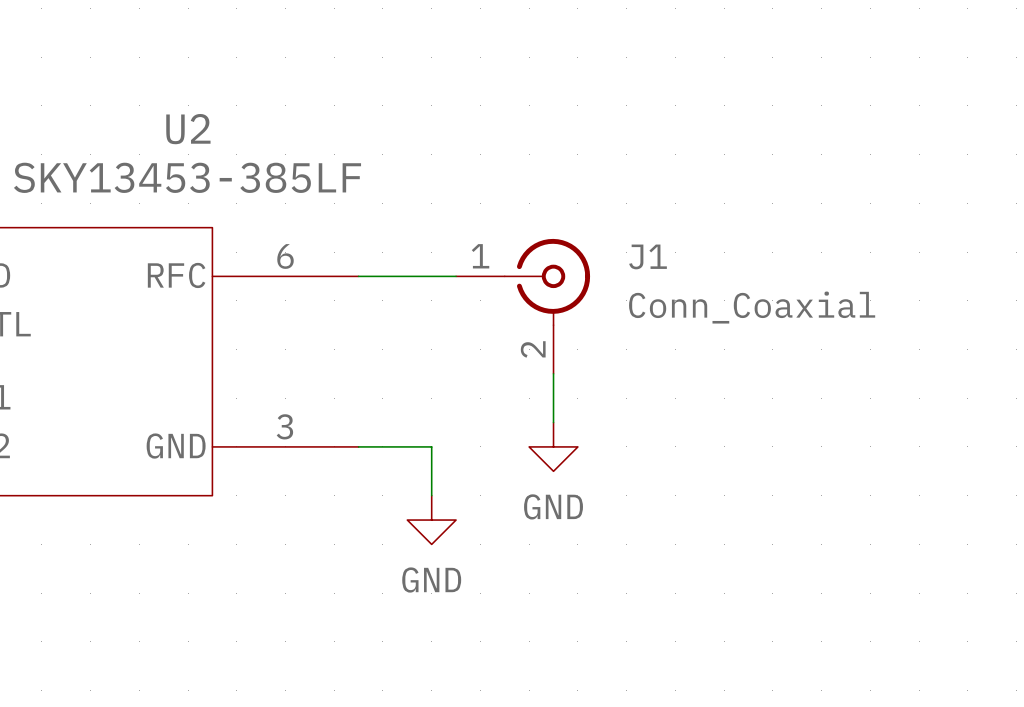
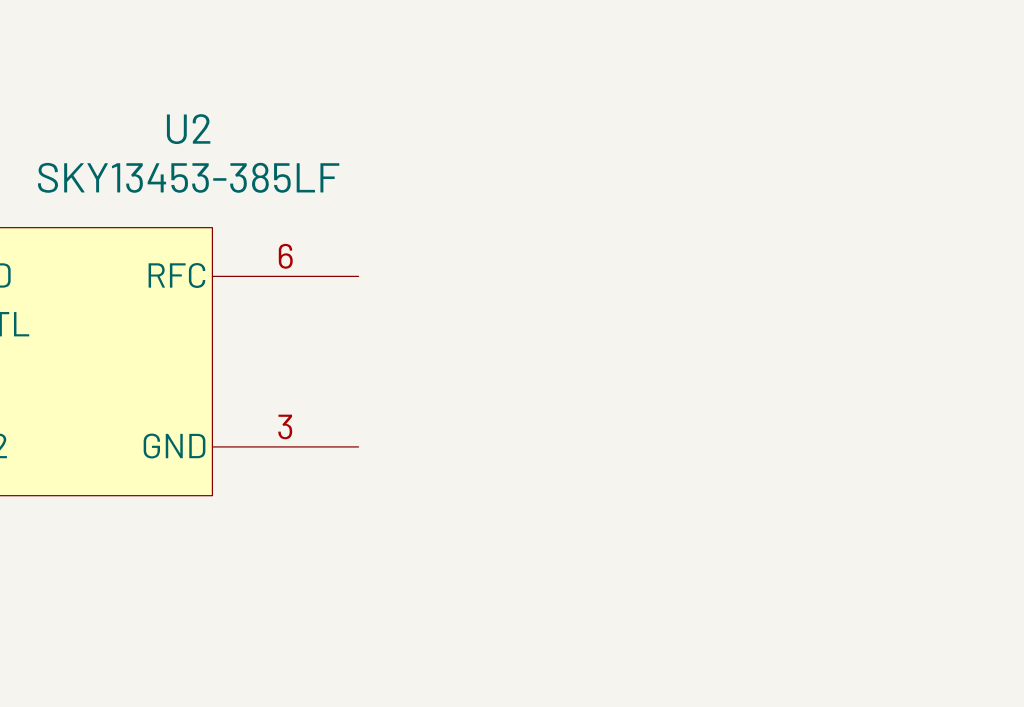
wire: (358, 276) (456, 276) -> none
J1: Conn_Coaxial (523, 306) -> none
wire: (553, 373) (553, 422) -> none
wire: (358, 446) (431, 446) (431, 495) -> none
power symbol: GND (553, 446) -> none
power symbol: GND (431, 520) -> none

